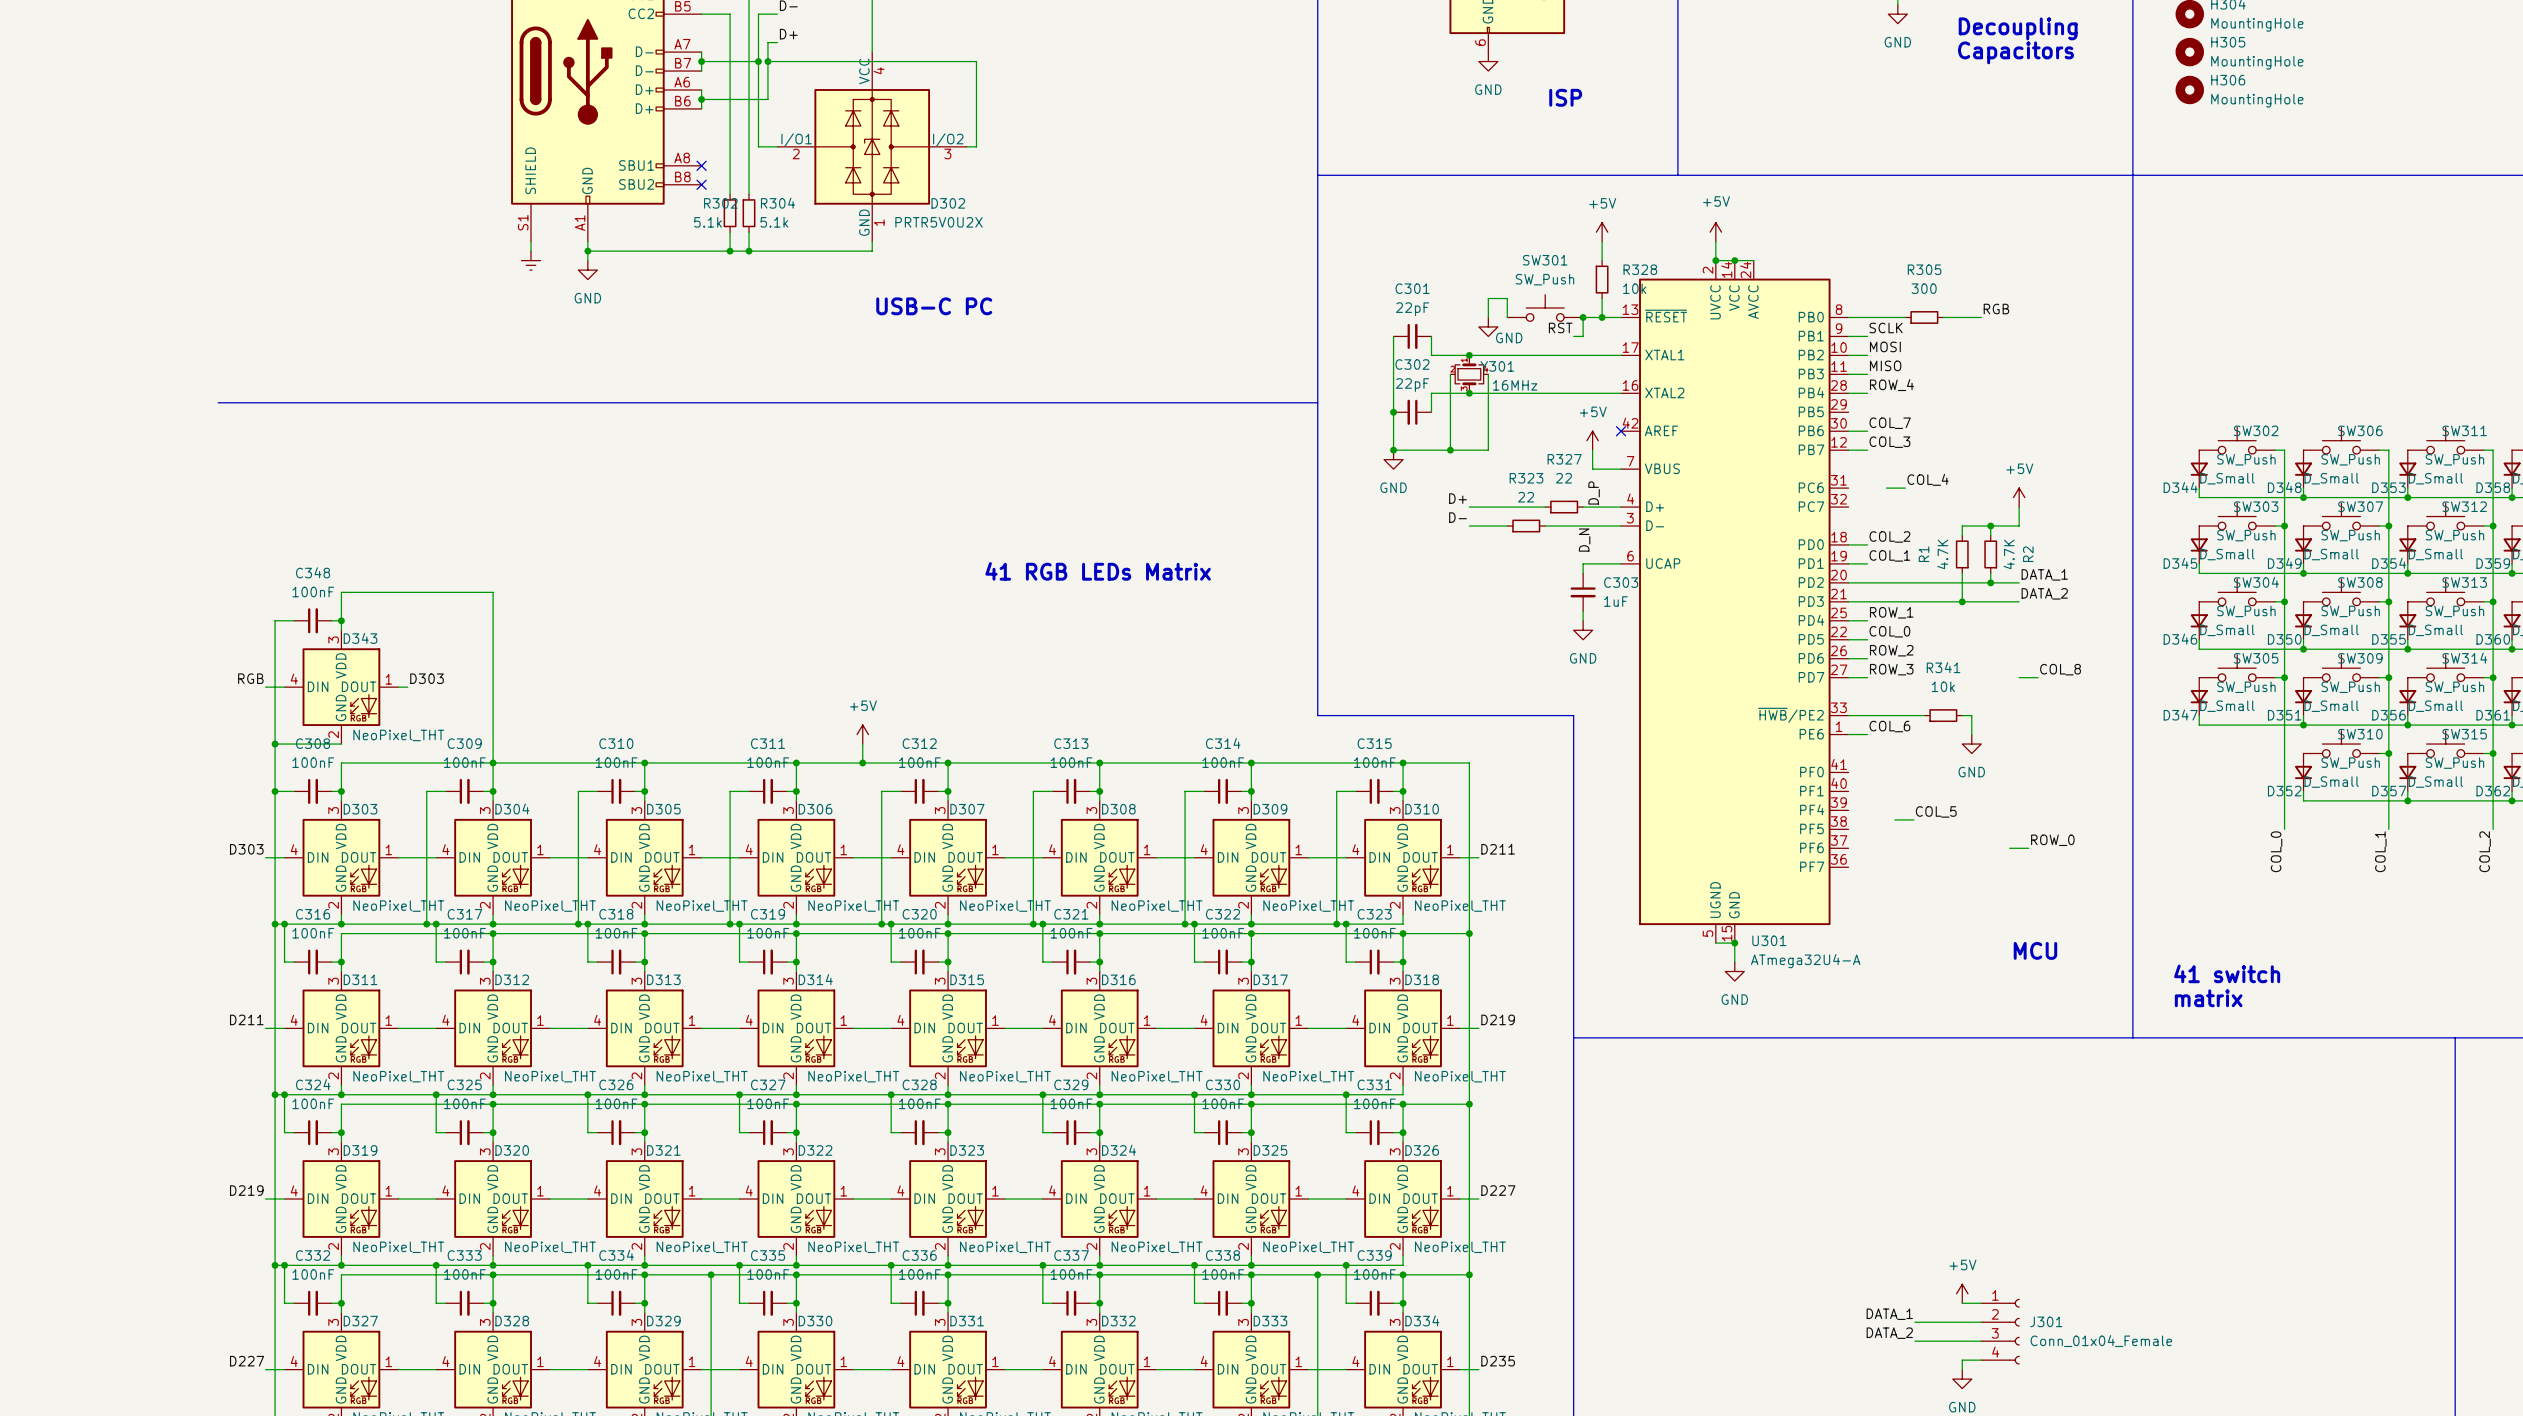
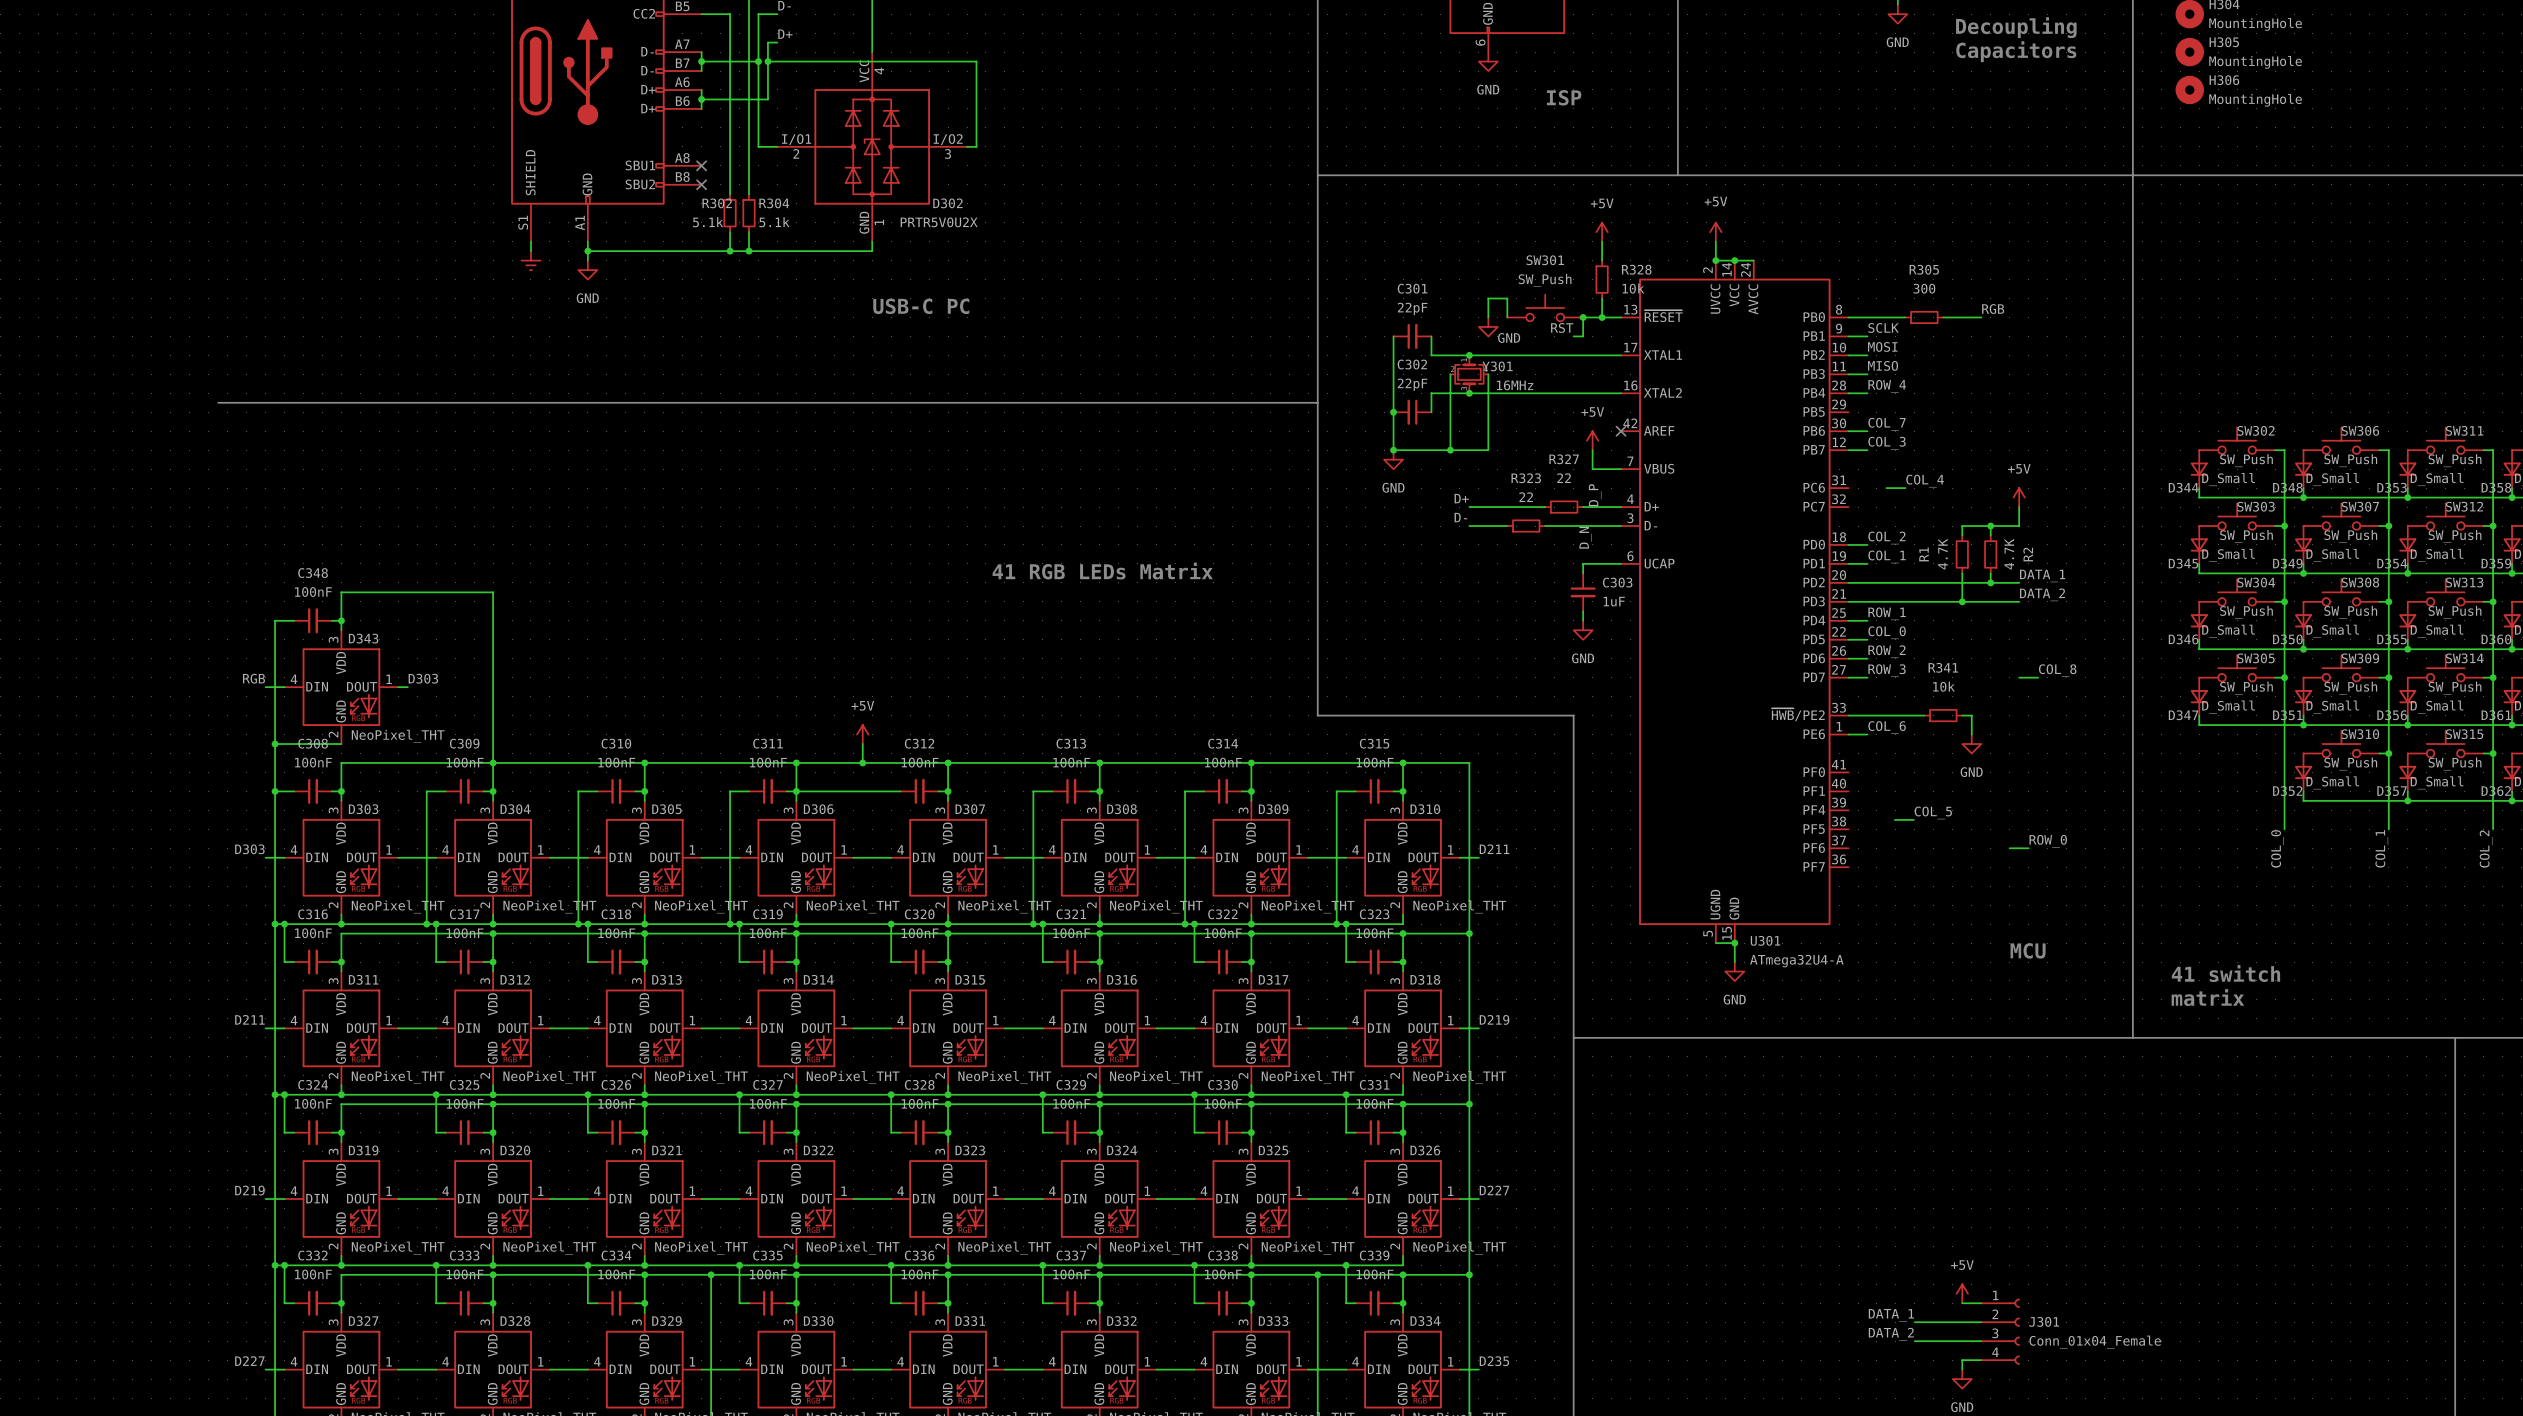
wire: (881, 791) (881, 924) -> (881, 791) (796, 791)
junction: (881, 924) -> none

